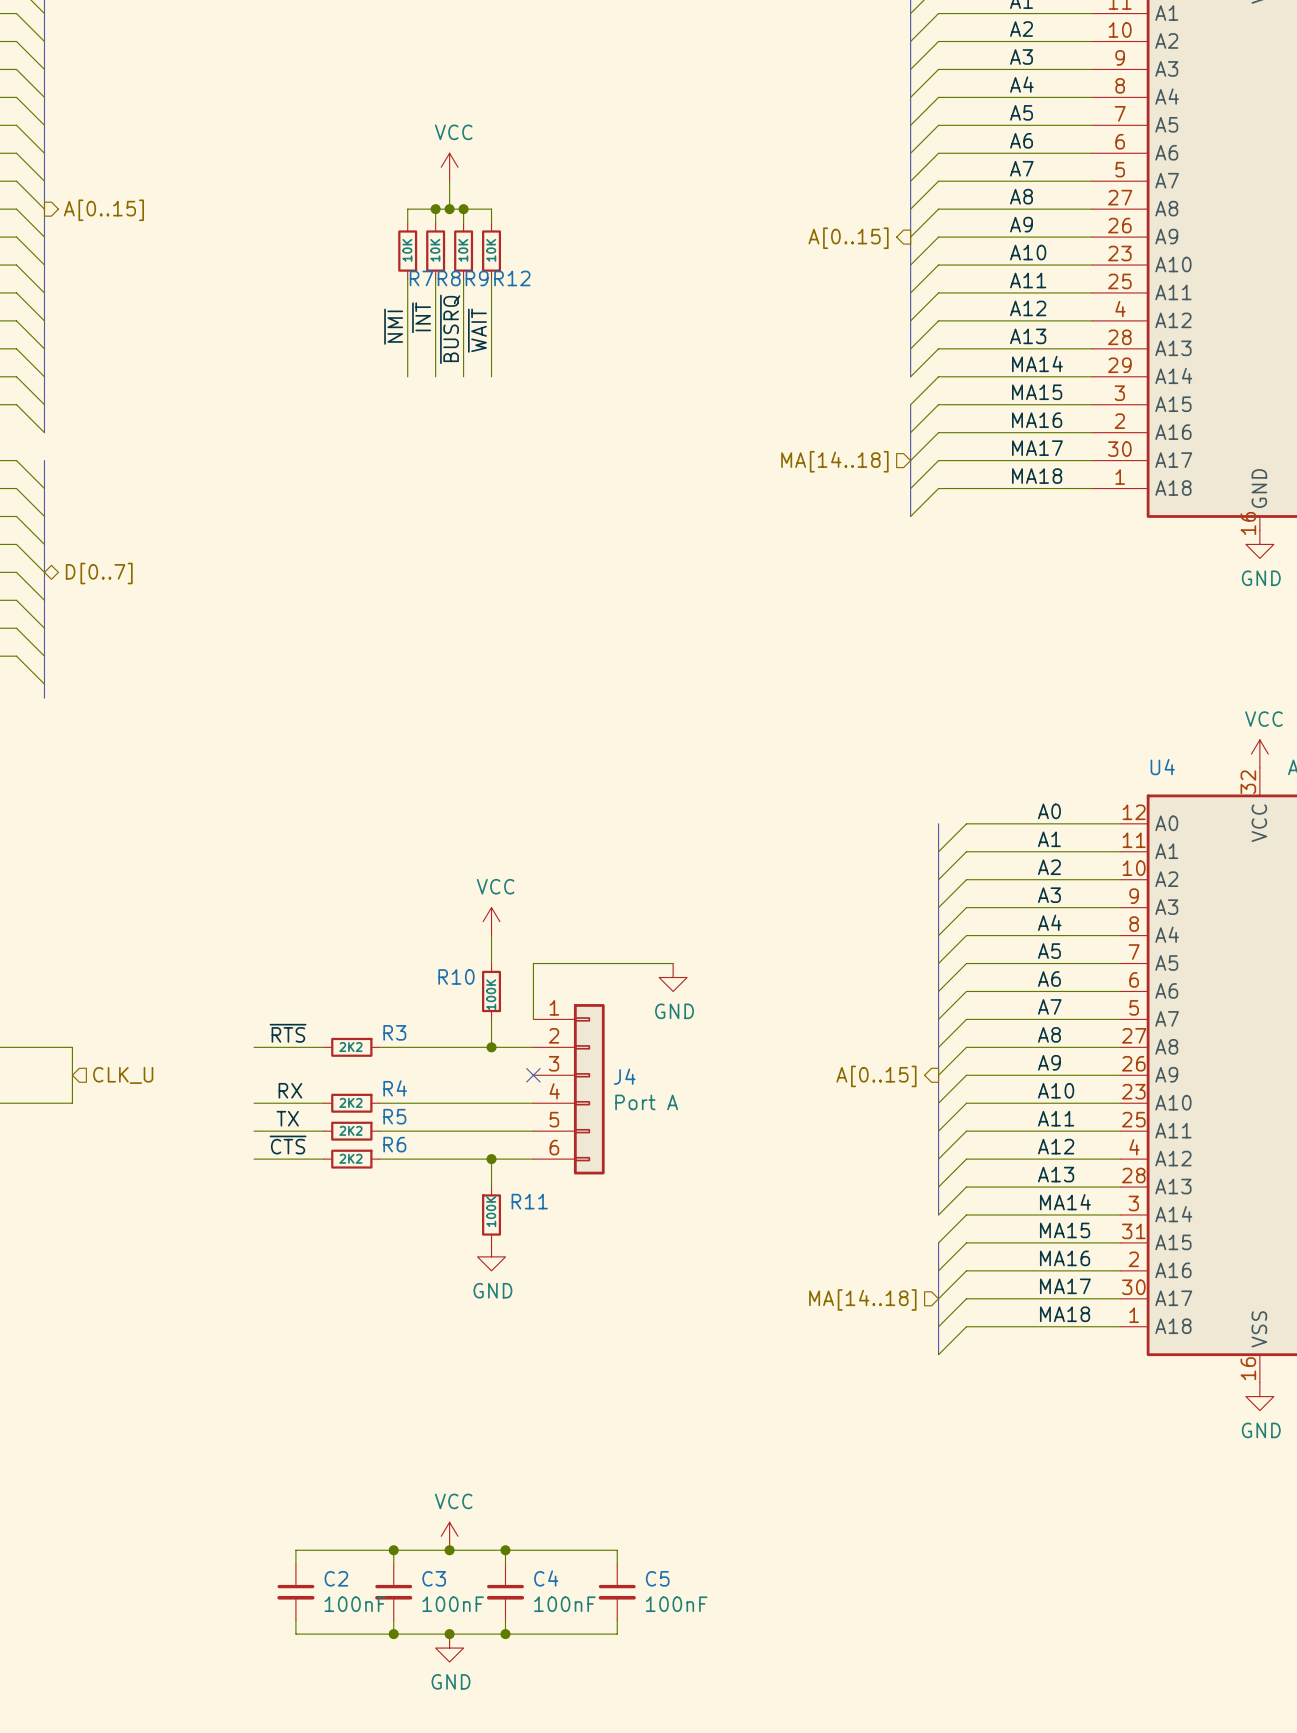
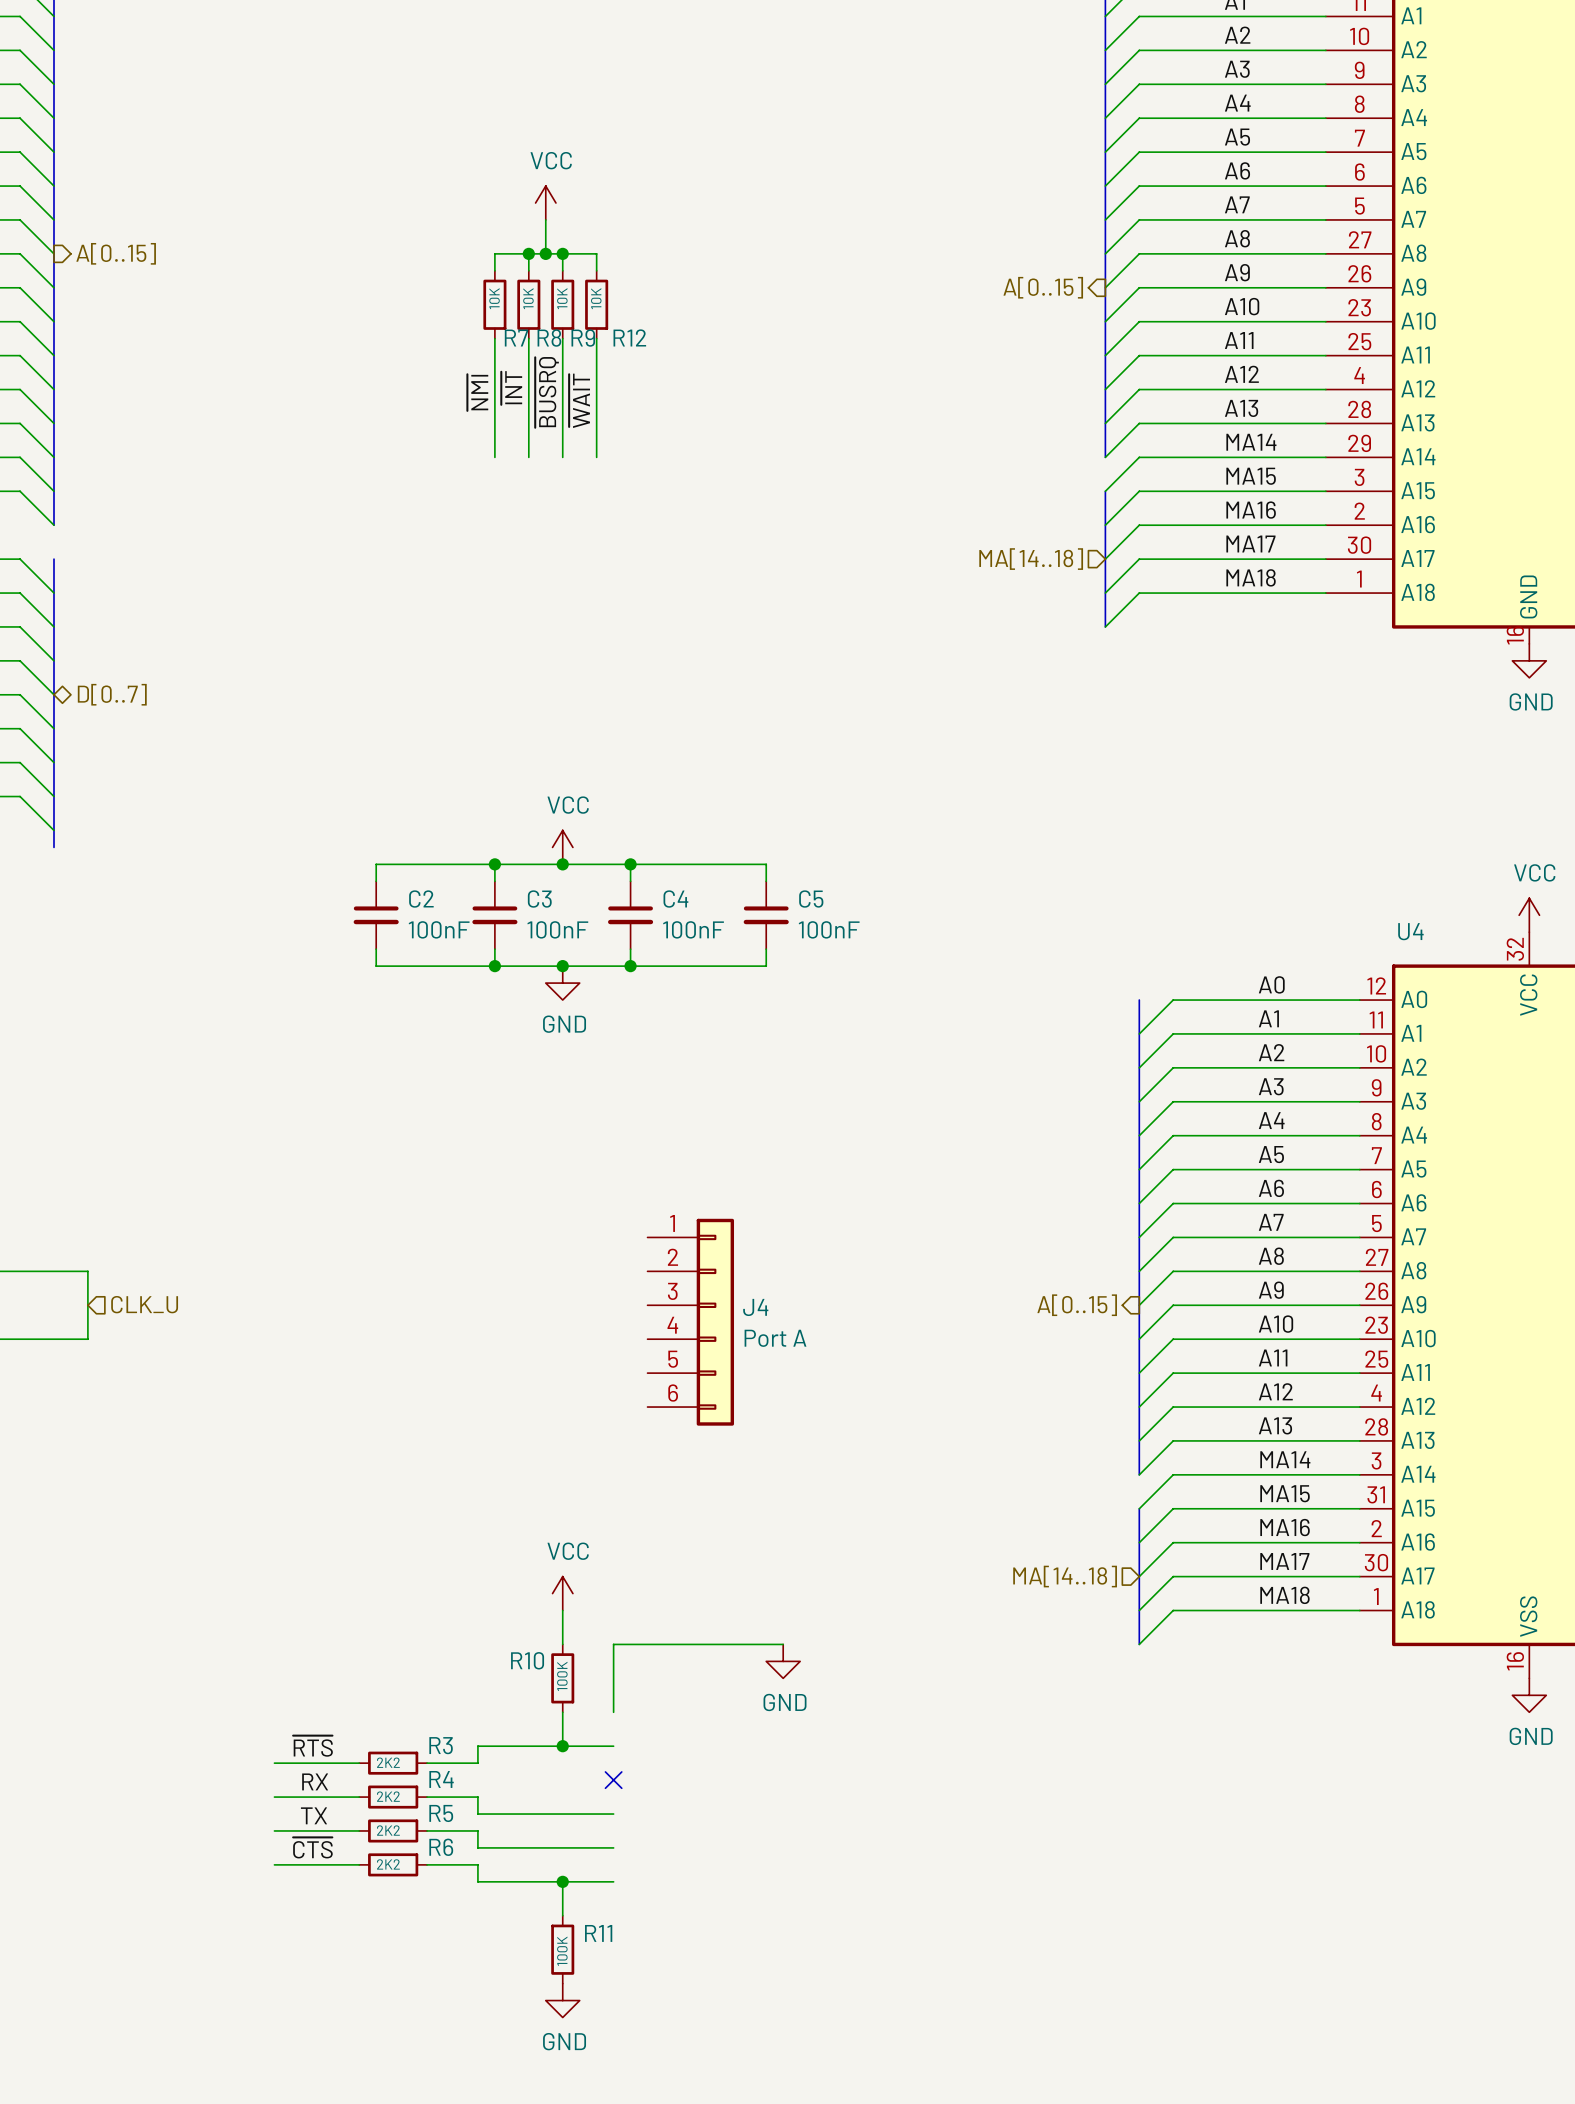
power symbol: none -> VCC (562, 847)
wire: none -> (494, 864) (494, 881)
junction: none -> (494, 864)
junction: none -> (562, 864)
wire: none -> (630, 864) (630, 881)
junction: none -> (630, 864)
wire: none -> (376, 881) (376, 864) (766, 864) (766, 881)
wire: none -> (376, 949) (376, 966) (766, 966) (766, 949)
wire: none -> (494, 949) (494, 966)
wire: none -> (630, 949) (630, 966)
junction: none -> (494, 966)
junction: none -> (562, 966)
junction: none -> (630, 966)
power symbol: none -> GND (562, 983)
power symbol: VCC (491, 921) -> none
wire: (491, 935) (491, 963) -> none
wire: (673, 963) (533, 963) (533, 1019) -> none
power symbol: GND (673, 977) -> none
R10 position: (491, 991) -> (562, 1678)
wire: (491, 1019) (491, 1047) -> none
label: ~{RTS} (288, 1033) -> none
wire: (254, 1047) (323, 1047) -> none
R3 position: (351, 1047) -> (393, 1763)
wire: (379, 1047) (533, 1047) -> none
junction: (491, 1047) -> none
no-connect mark: (533, 1075) -> none
label: RX (290, 1090) -> none
wire: (254, 1103) (323, 1103) -> none
R4 position: (351, 1103) -> (393, 1797)
wire: (379, 1103) (533, 1103) -> none
label: TX (287, 1118) -> none
wire: (254, 1131) (323, 1131) -> none
R5 position: (351, 1131) -> (393, 1830)
wire: (379, 1131) (533, 1131) -> none
label: ~{CTS} (288, 1145) -> none
wire: (254, 1159) (323, 1159) -> none
R6 position: (351, 1159) -> (393, 1864)
wire: (379, 1159) (533, 1159) -> none
wire: (491, 1159) (491, 1187) -> (562, 1610) (562, 1644)
junction: (491, 1159) -> none
R11 position: (491, 1214) -> (562, 1949)
power symbol: GND (491, 1256) -> none
power symbol: none -> VCC (562, 1593)
wire: none -> (783, 1644) (613, 1644) (613, 1712)
power symbol: none -> GND (783, 1661)
wire: none -> (562, 1712) (562, 1746)
label: none -> ~{RTS} (312, 1746)
junction: none -> (562, 1746)
wire: none -> (613, 1746) (477, 1746) (477, 1763) (427, 1763)
wire: none -> (274, 1763) (359, 1763)
no-connect mark: none -> (613, 1780)
label: none -> RX (315, 1781)
wire: none -> (274, 1797) (359, 1797)
wire: none -> (427, 1797) (477, 1797) (477, 1814) (613, 1814)
label: none -> TX (313, 1815)
wire: none -> (274, 1830) (359, 1830)
wire: none -> (427, 1830) (477, 1830) (477, 1847) (613, 1847)
label: none -> ~{CTS} (312, 1847)
wire: none -> (274, 1864) (359, 1864)
wire: none -> (427, 1864) (477, 1864) (477, 1881)
power symbol: VCC (449, 1536) -> none
junction: (393, 1550) -> none
junction position: (449, 1550) -> (562, 1881)
wire: none -> (562, 1881) (562, 1915)
junction: (505, 1550) -> none
wire: (295, 1564) (295, 1550) (393, 1550) (393, 1564) -> none
wire: (505, 1564) (505, 1550) (617, 1550) (617, 1564) -> none
C2 position: (295, 1592) -> (376, 915)
C3 position: (393, 1592) -> (494, 915)
C4 position: (505, 1592) -> (630, 915)
C5 position: (617, 1592) -> (766, 915)
wire: (295, 1620) (295, 1634) (617, 1634) (617, 1620) -> none
wire: (393, 1620) (393, 1634) -> none
wire: (505, 1620) (505, 1634) -> none
junction: (393, 1634) -> none
junction: (449, 1634) -> none
junction: (505, 1634) -> none
power symbol position: GND (449, 1648) -> GND (562, 2000)

